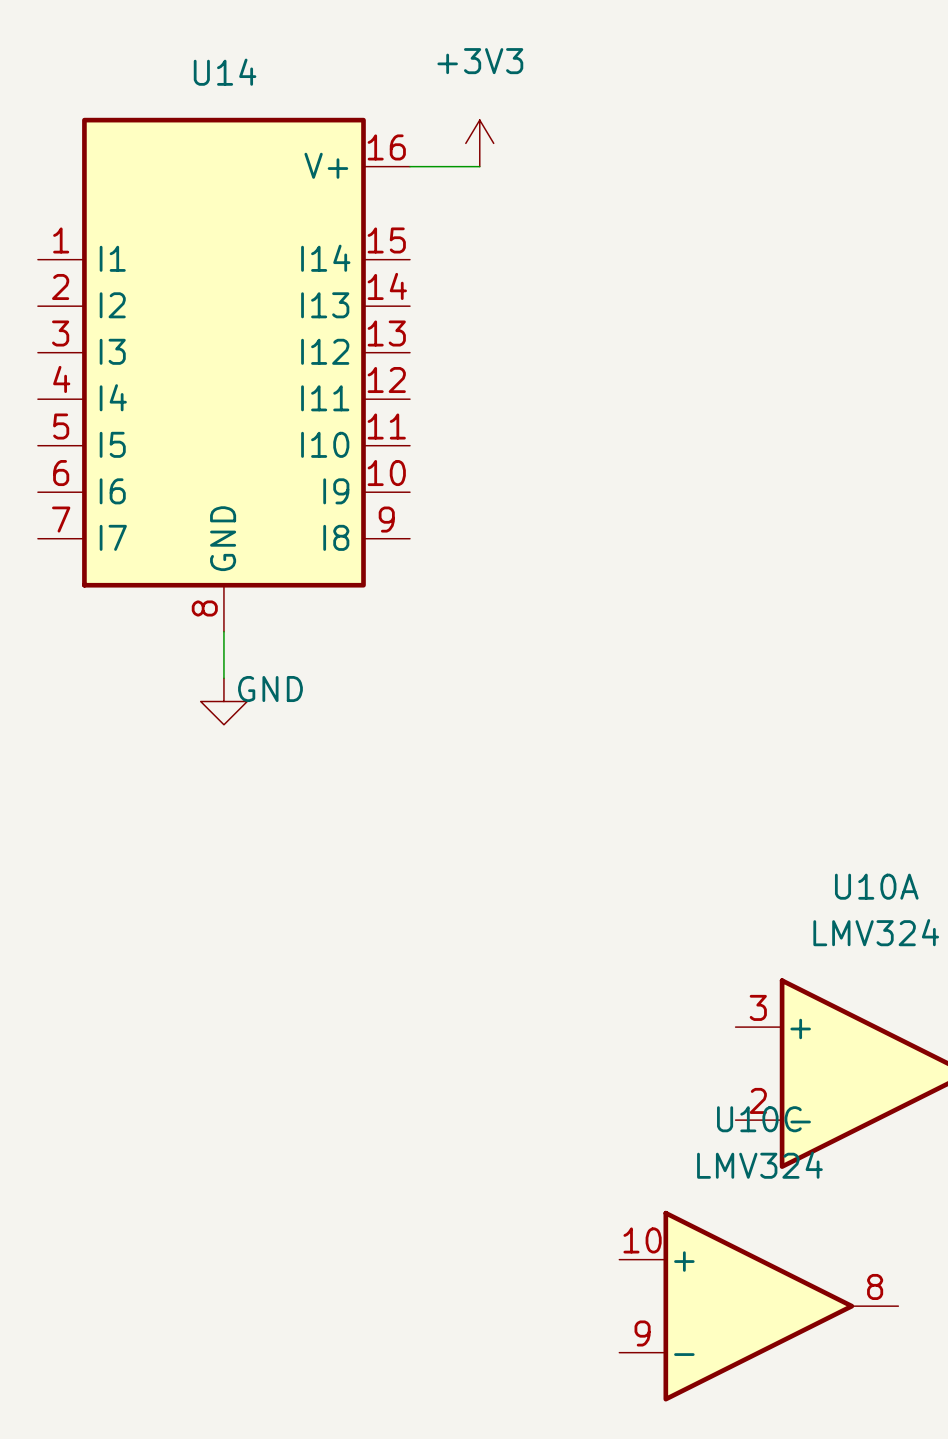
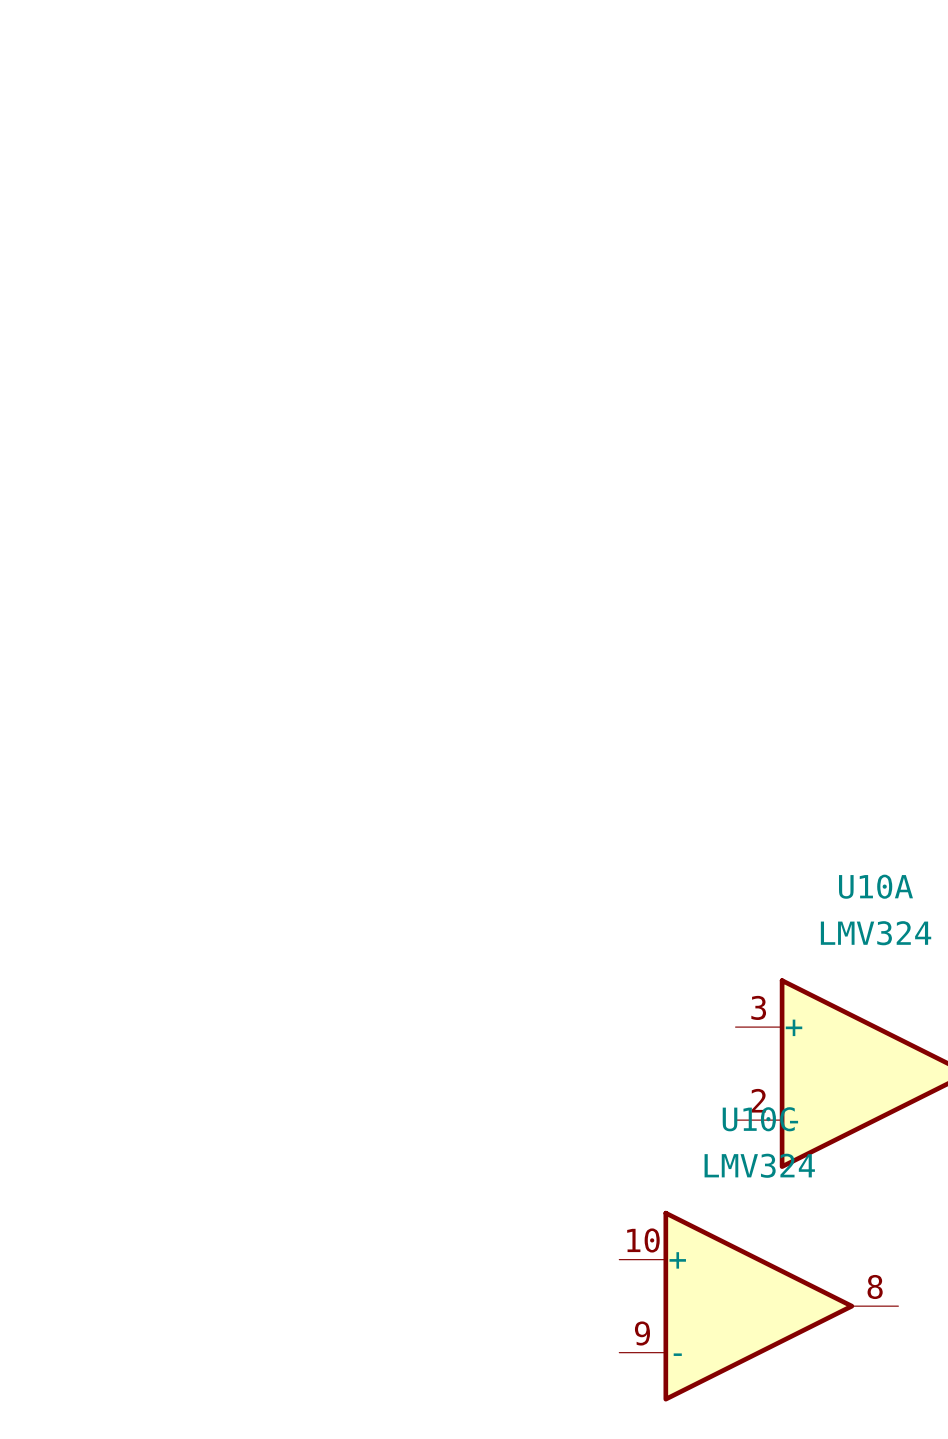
power symbol: +3V3 (479, 143) -> none
wire: (410, 166) (479, 166) -> none
U14: (223, 374) -> none
wire: (223, 631) (223, 678) -> none
power symbol: GND (223, 701) -> none

